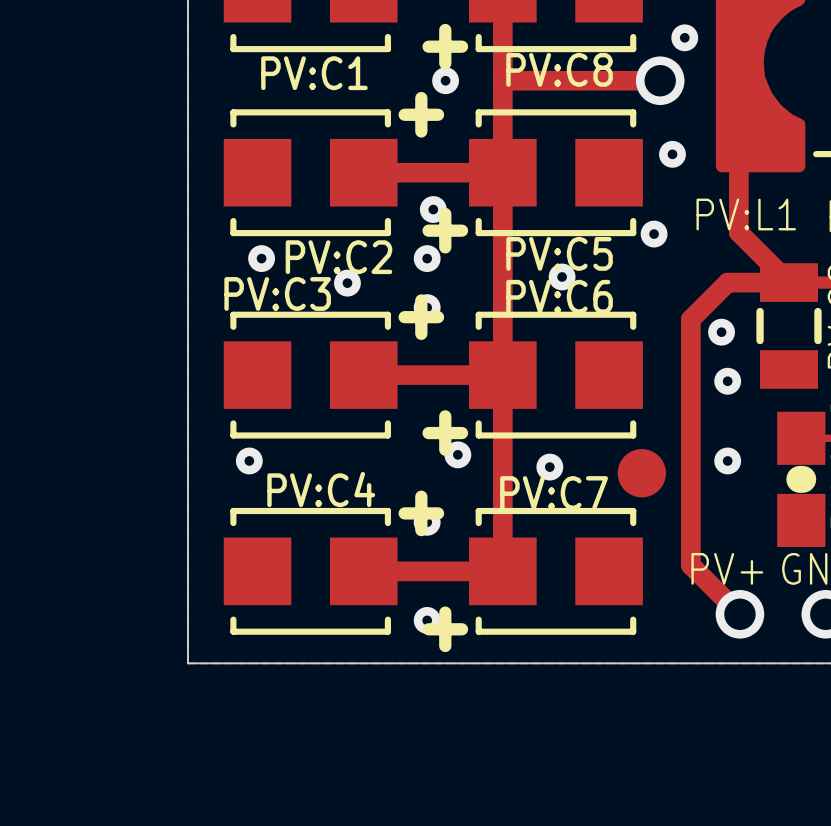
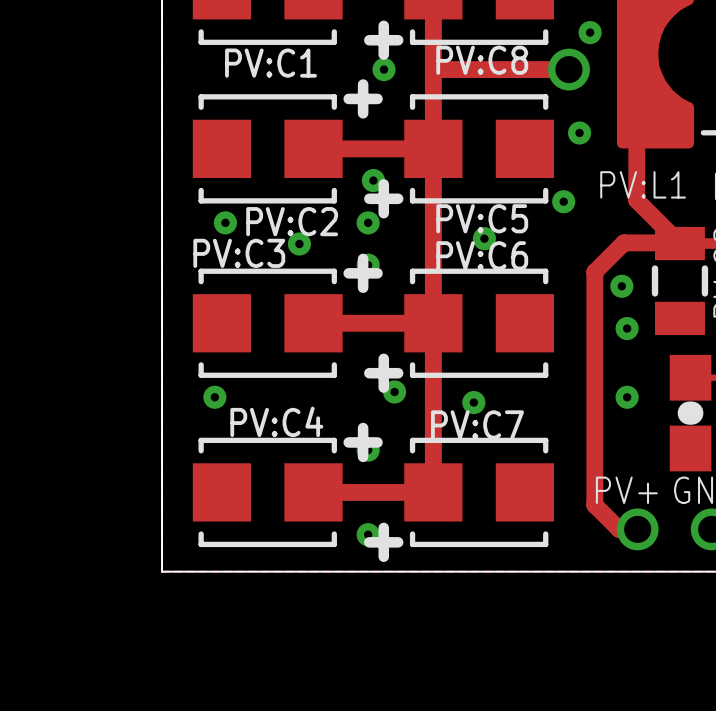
track: none -> (678, 242) (623, 242) (594, 272) (594, 505) (619, 529) (640, 529)
track: (789, 282) (727, 282) (690, 319) (690, 565) (739, 614) -> none
part: (641, 473) -> none

